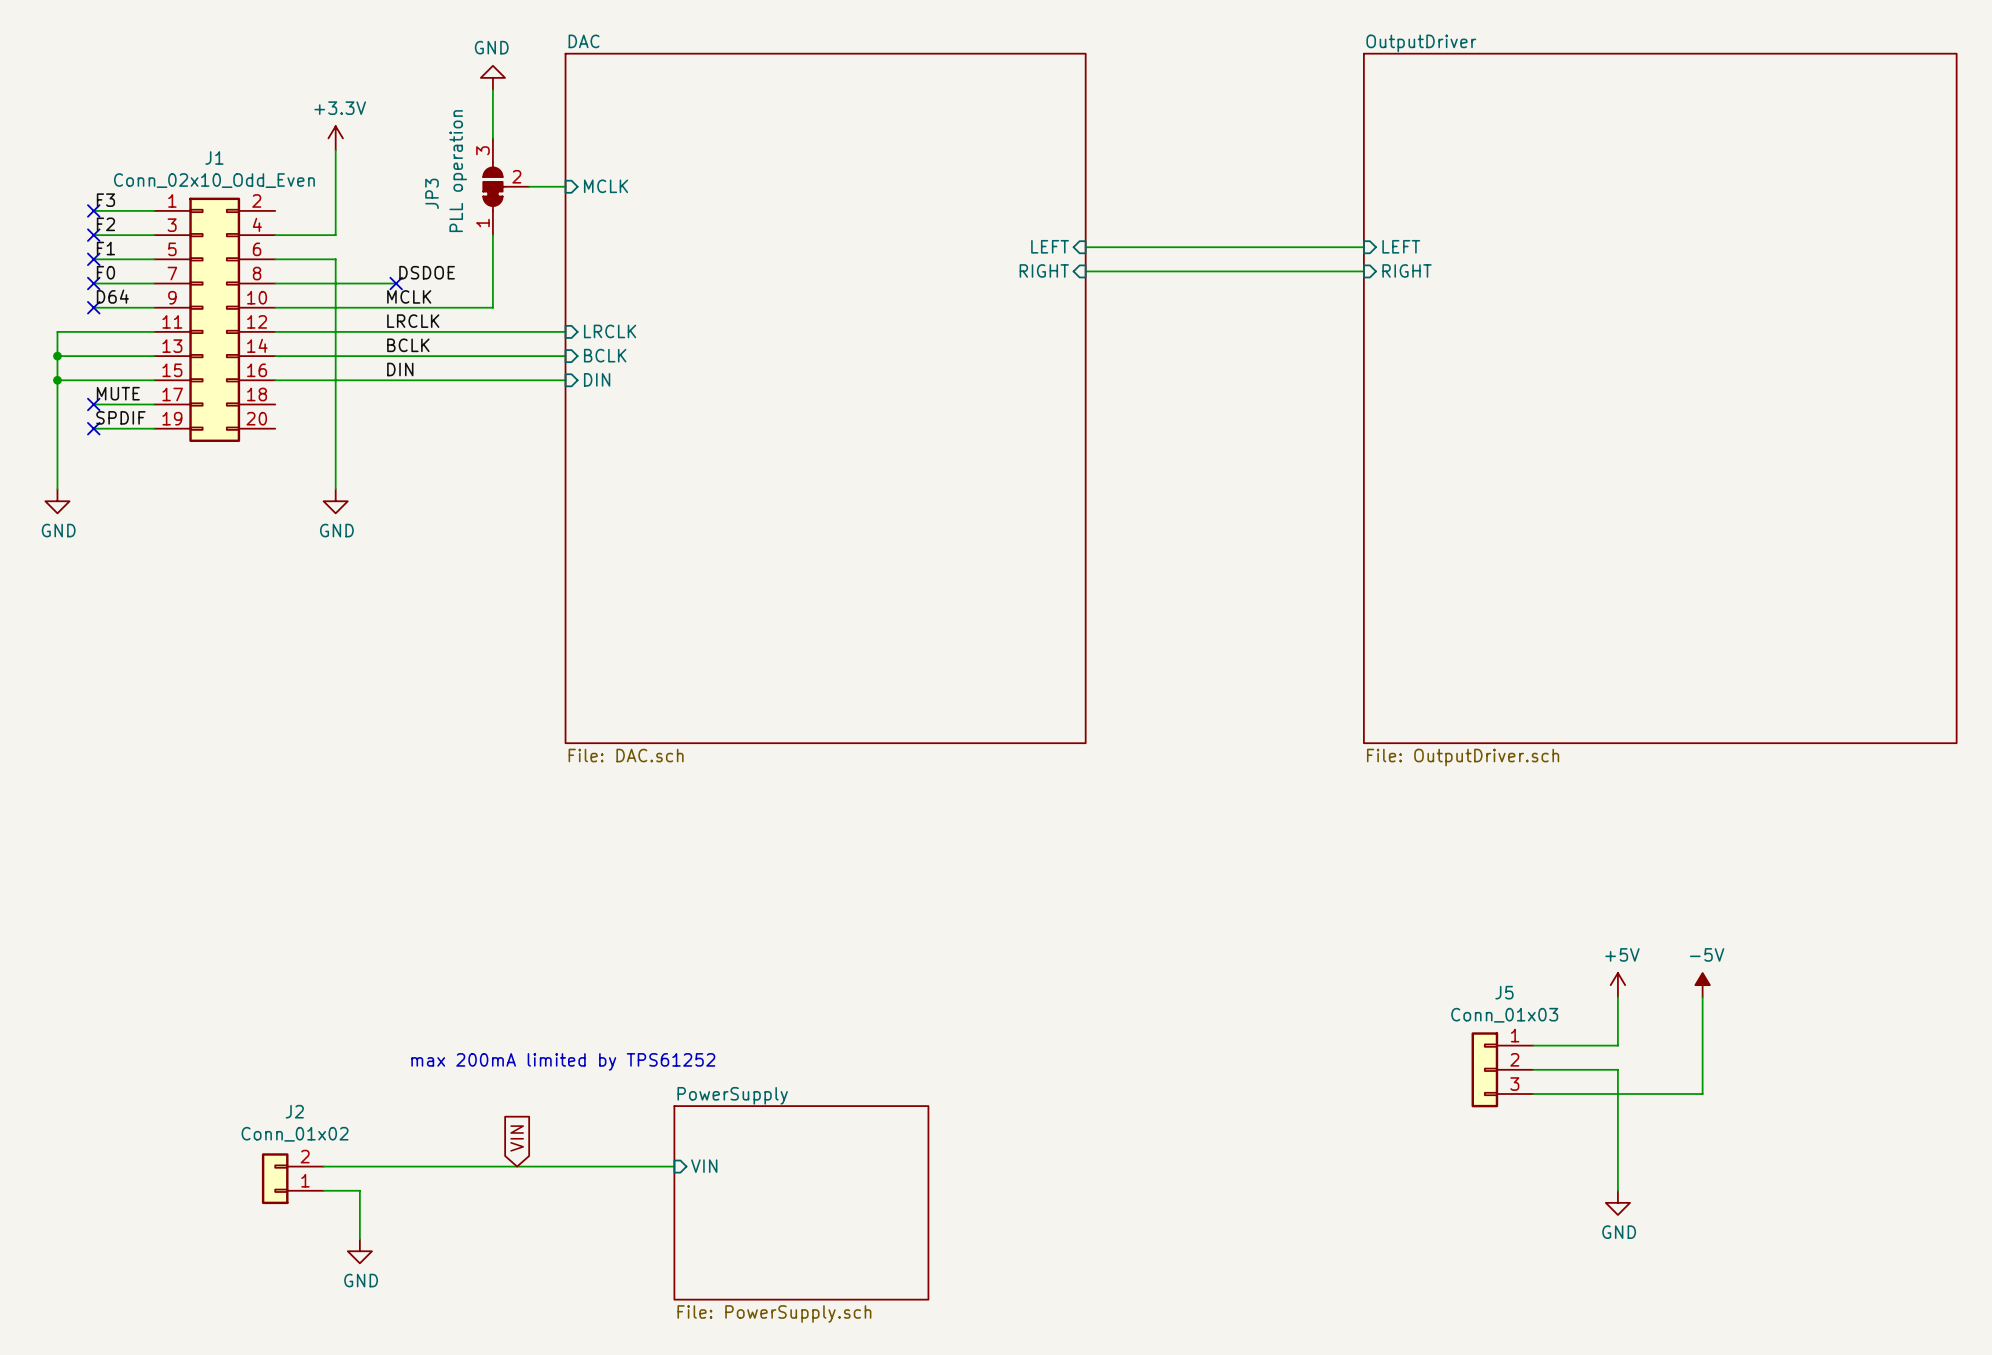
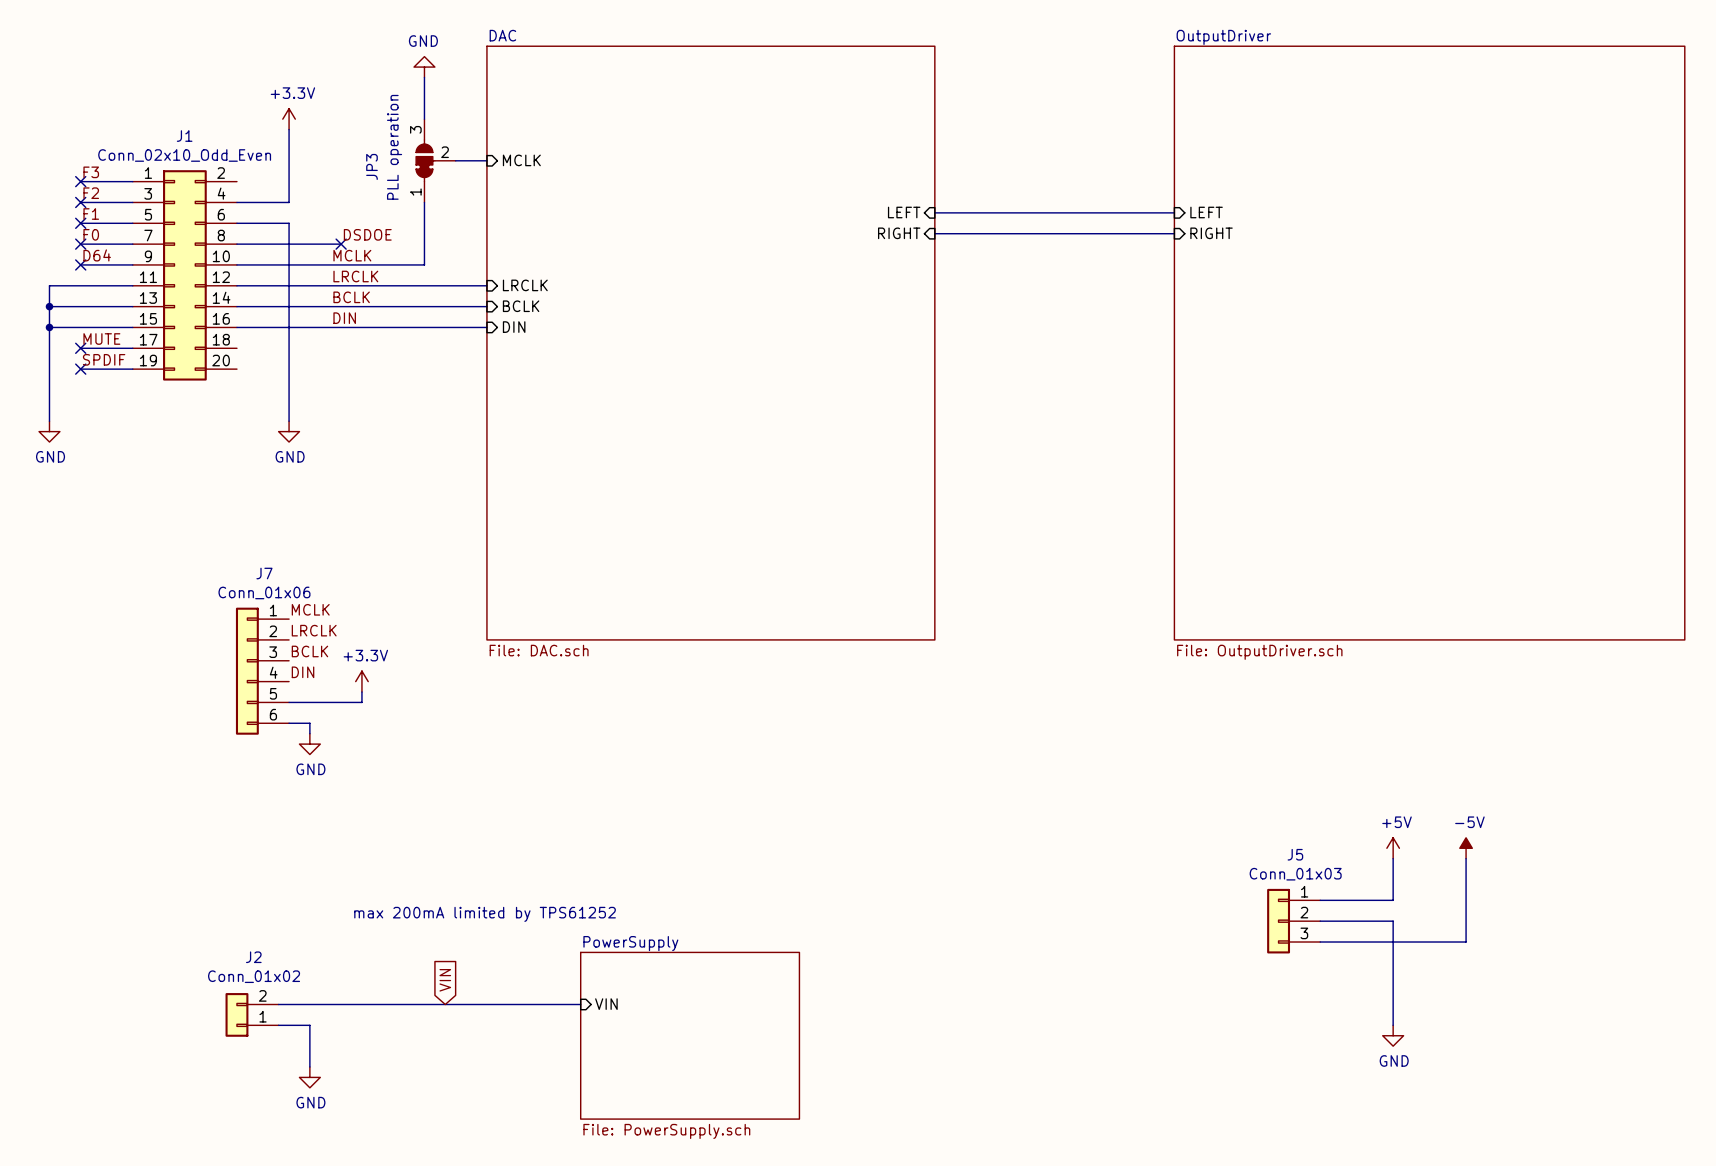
label: none -> MCLK (310, 609)
label: none -> LRCLK (314, 630)
label: none -> BCLK (309, 651)
J7: none -> Conn_01x06 (262, 671)
label: none -> DIN (303, 672)
power symbol: none -> +3.3V (361, 681)
wire: none -> (361, 692) (361, 702) (289, 702)
wire: none -> (289, 723) (309, 723) (309, 733)
power symbol: none -> GND (309, 744)

